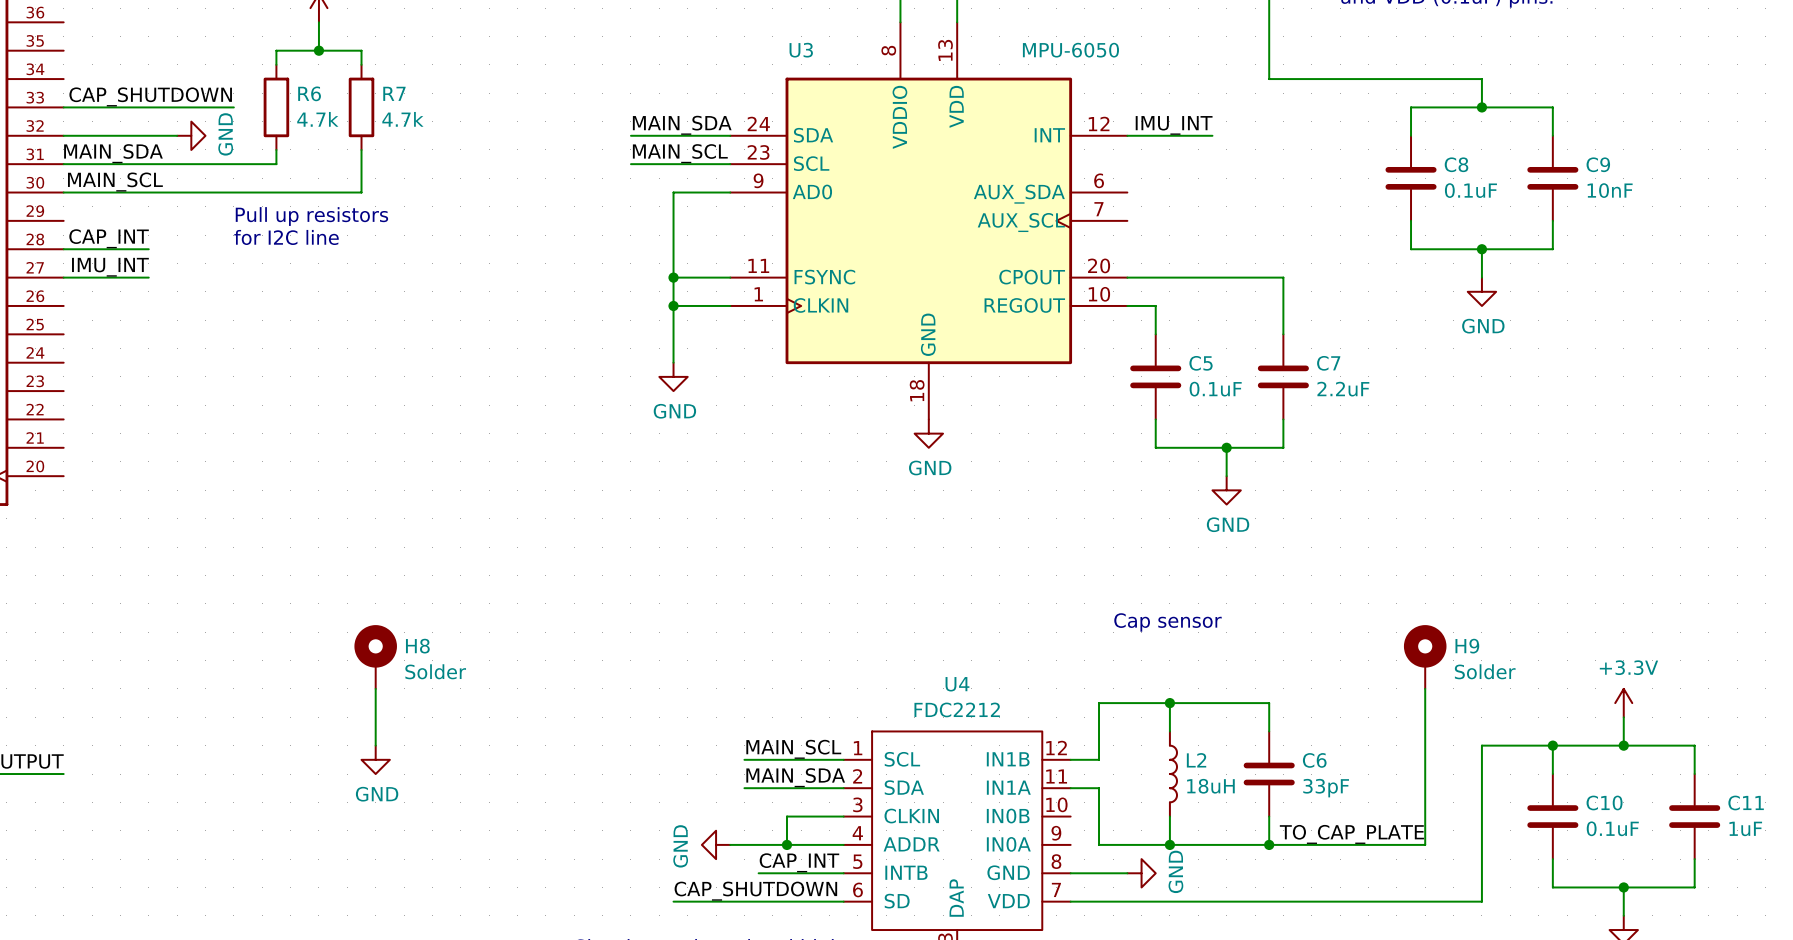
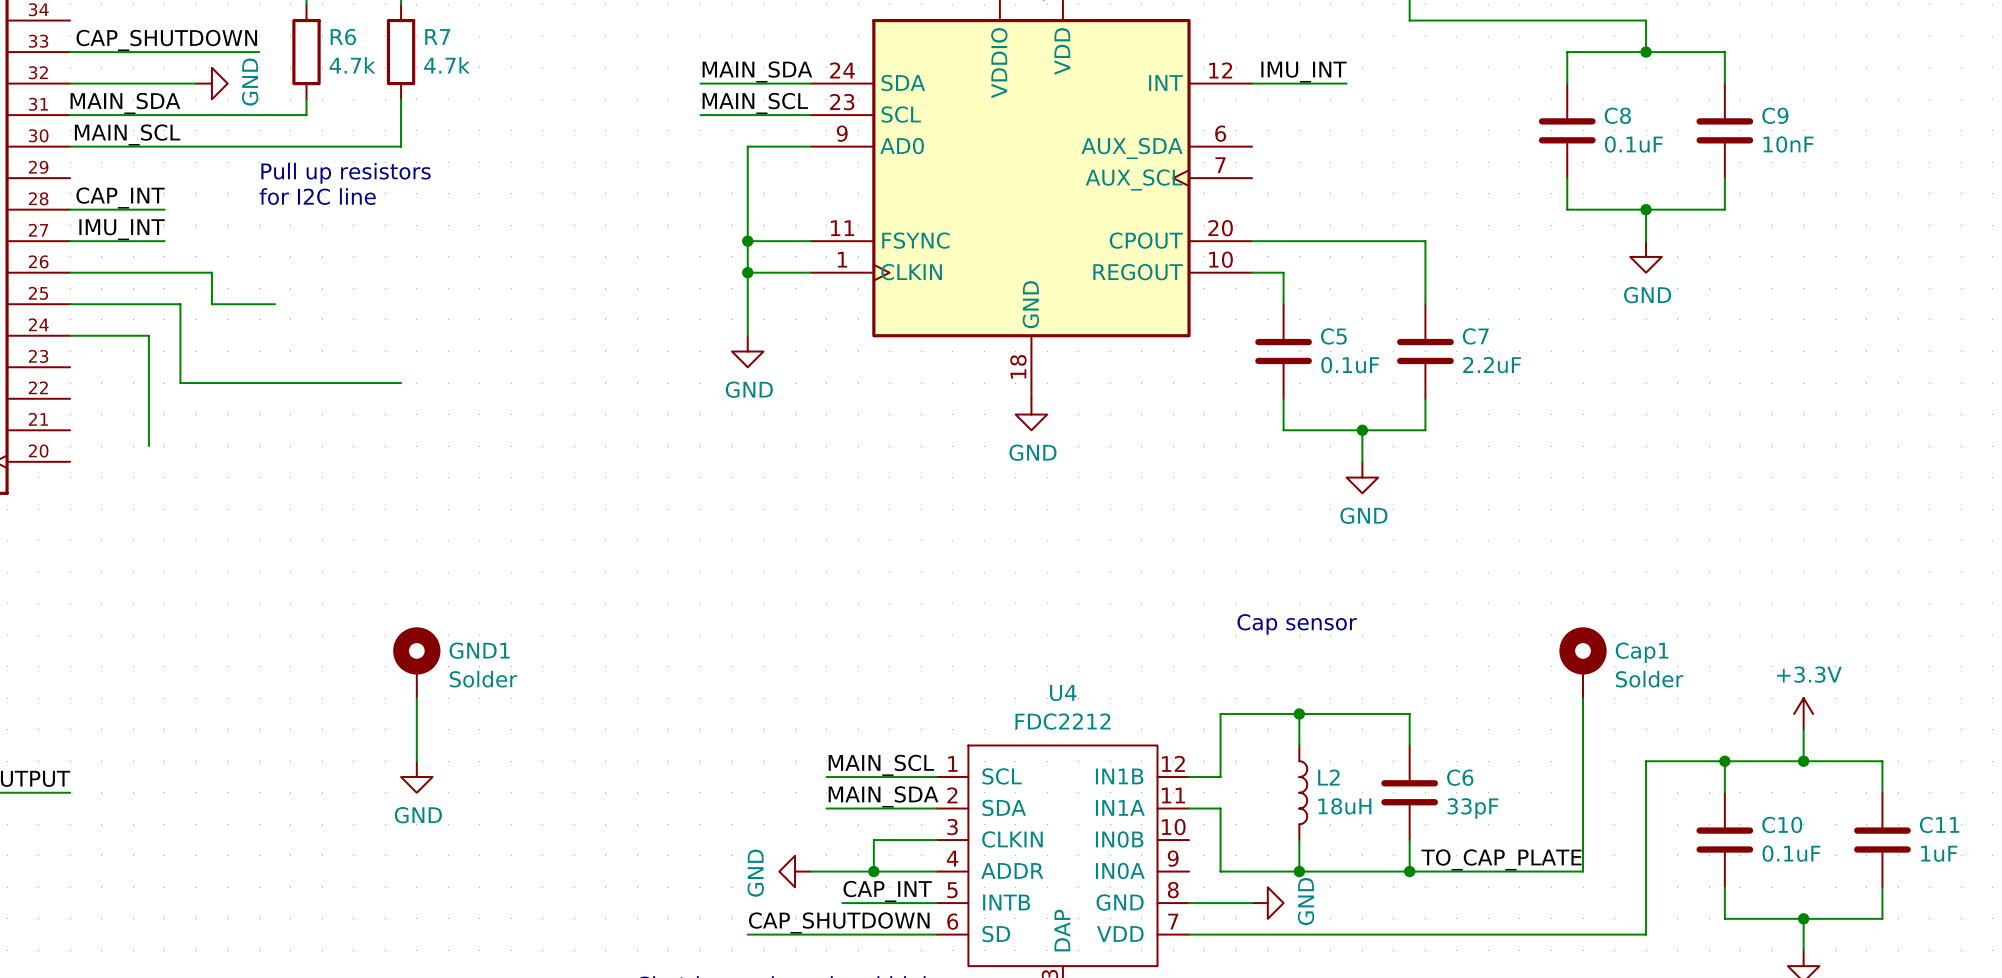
wire: none -> (70, 272) (211, 272) (211, 304) (274, 304)
wire: none -> (70, 304) (180, 304) (180, 383) (401, 383)
wire: none -> (70, 335) (148, 335) (148, 446)
H8 name: H8 (417, 646) -> GND1 (479, 650)
H9 name: H9 (1467, 646) -> Cap1 (1642, 652)

